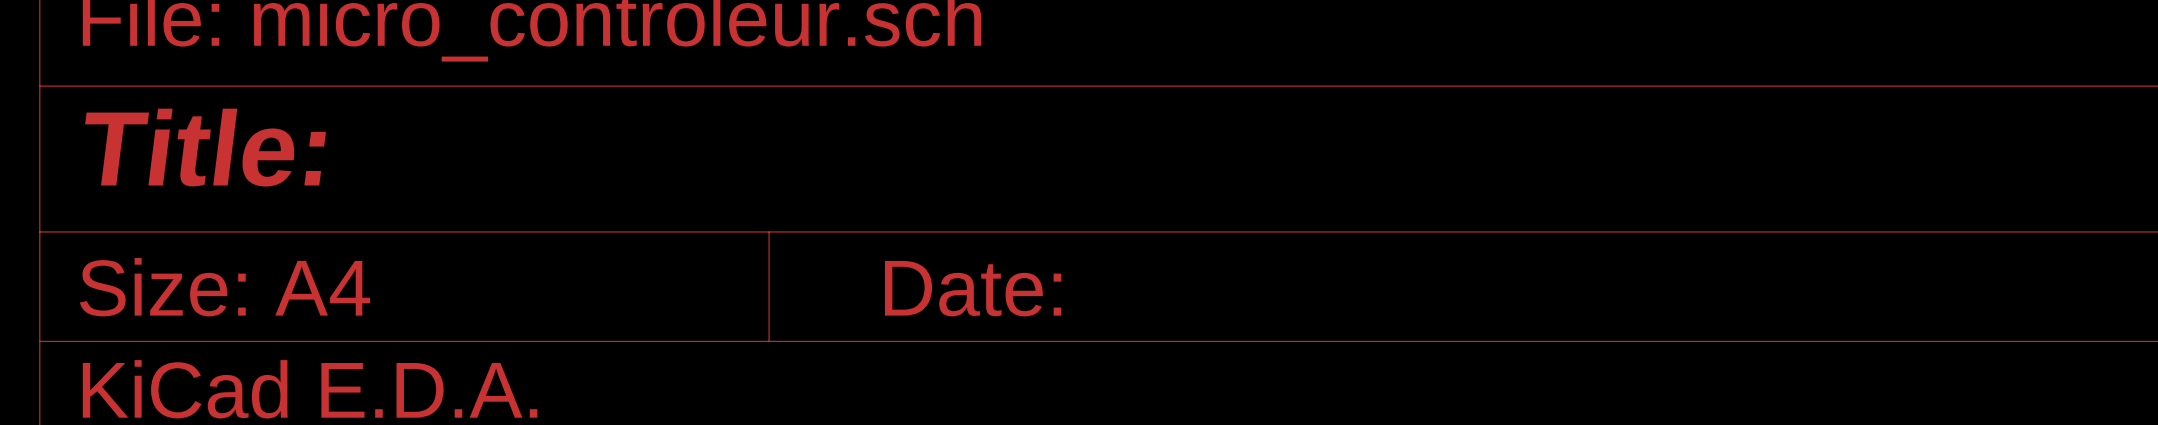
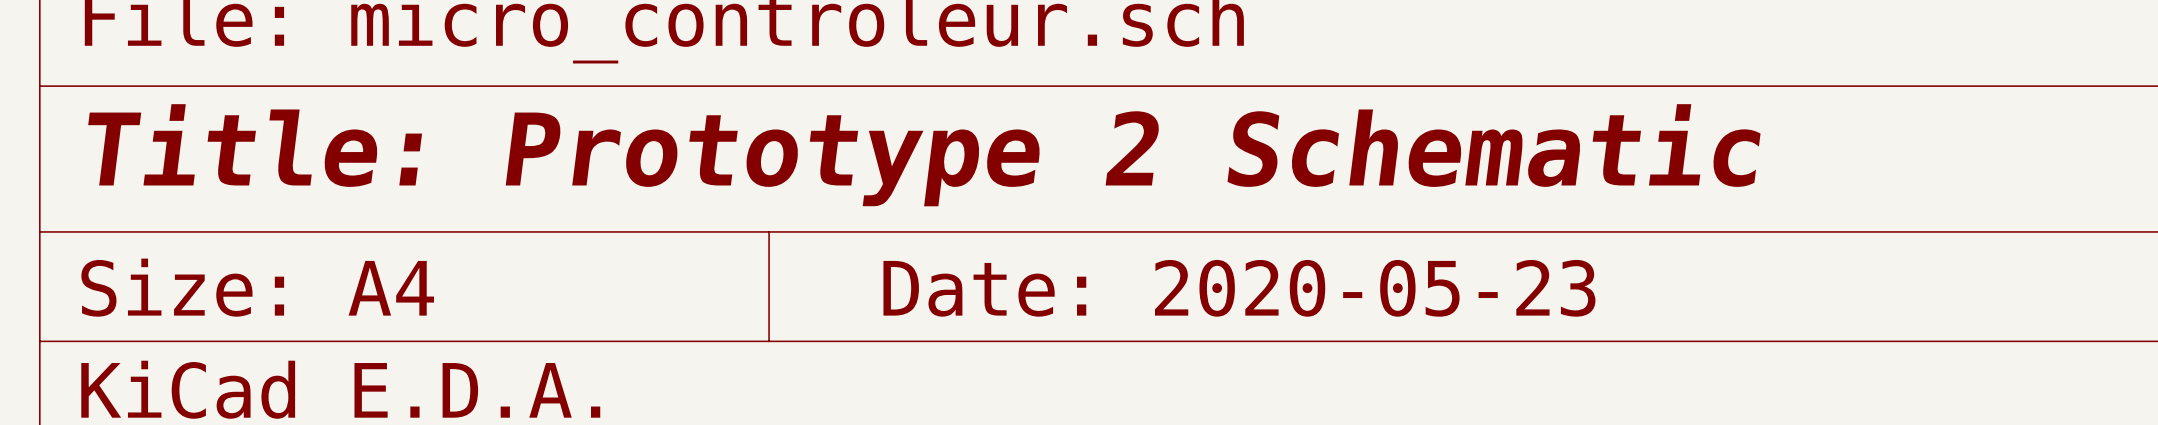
title block: Title: (205, 147) -> Title: Prototype 2 Schematic (924, 155)
title block: Date: (973, 288) -> Date: 2020-05-23 (1239, 288)

